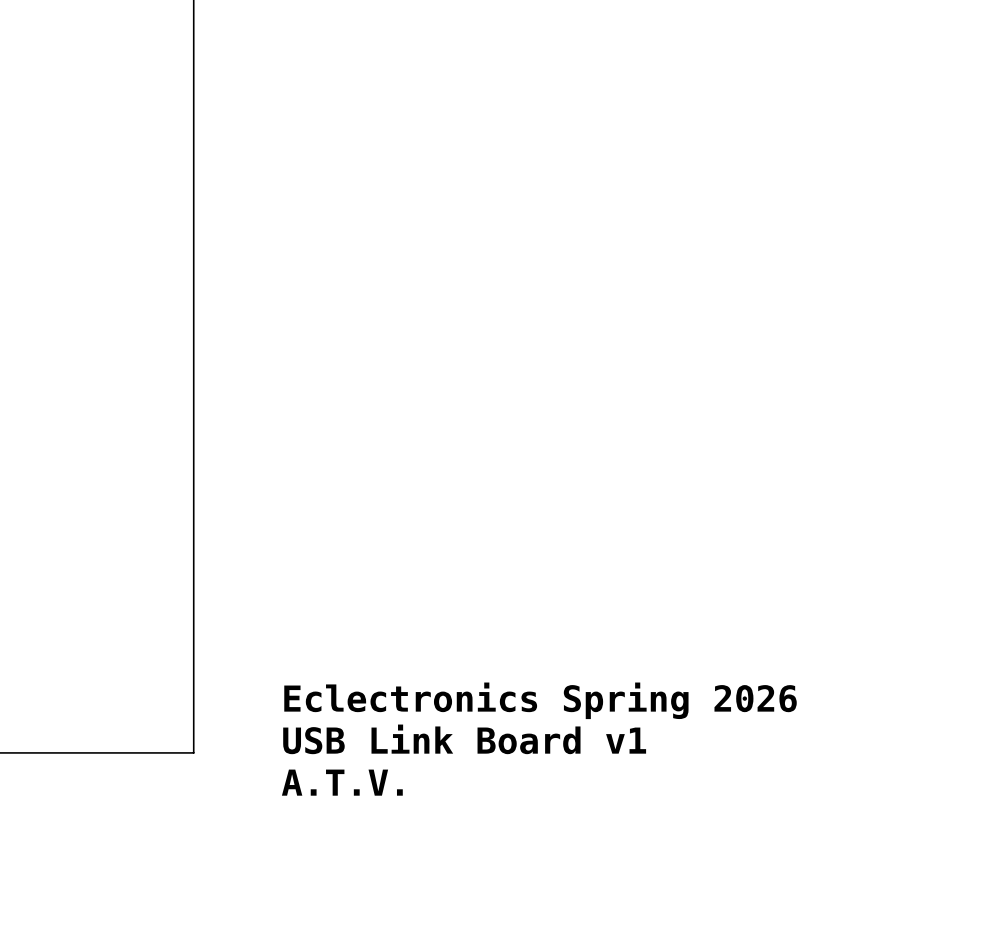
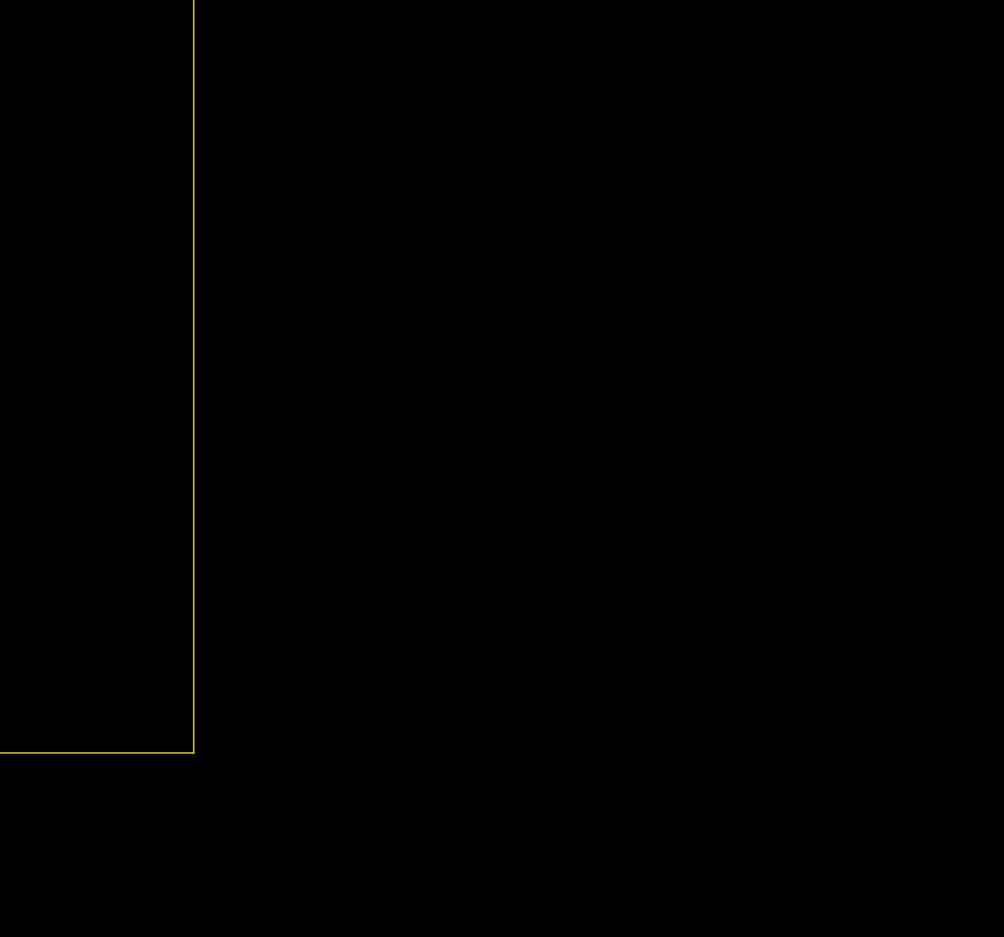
text: Eclectronics Spring 2026 (540, 700) -> none
text: USB Link Board v1 (464, 739) -> none
text: A.T.V. (342, 782) -> none

